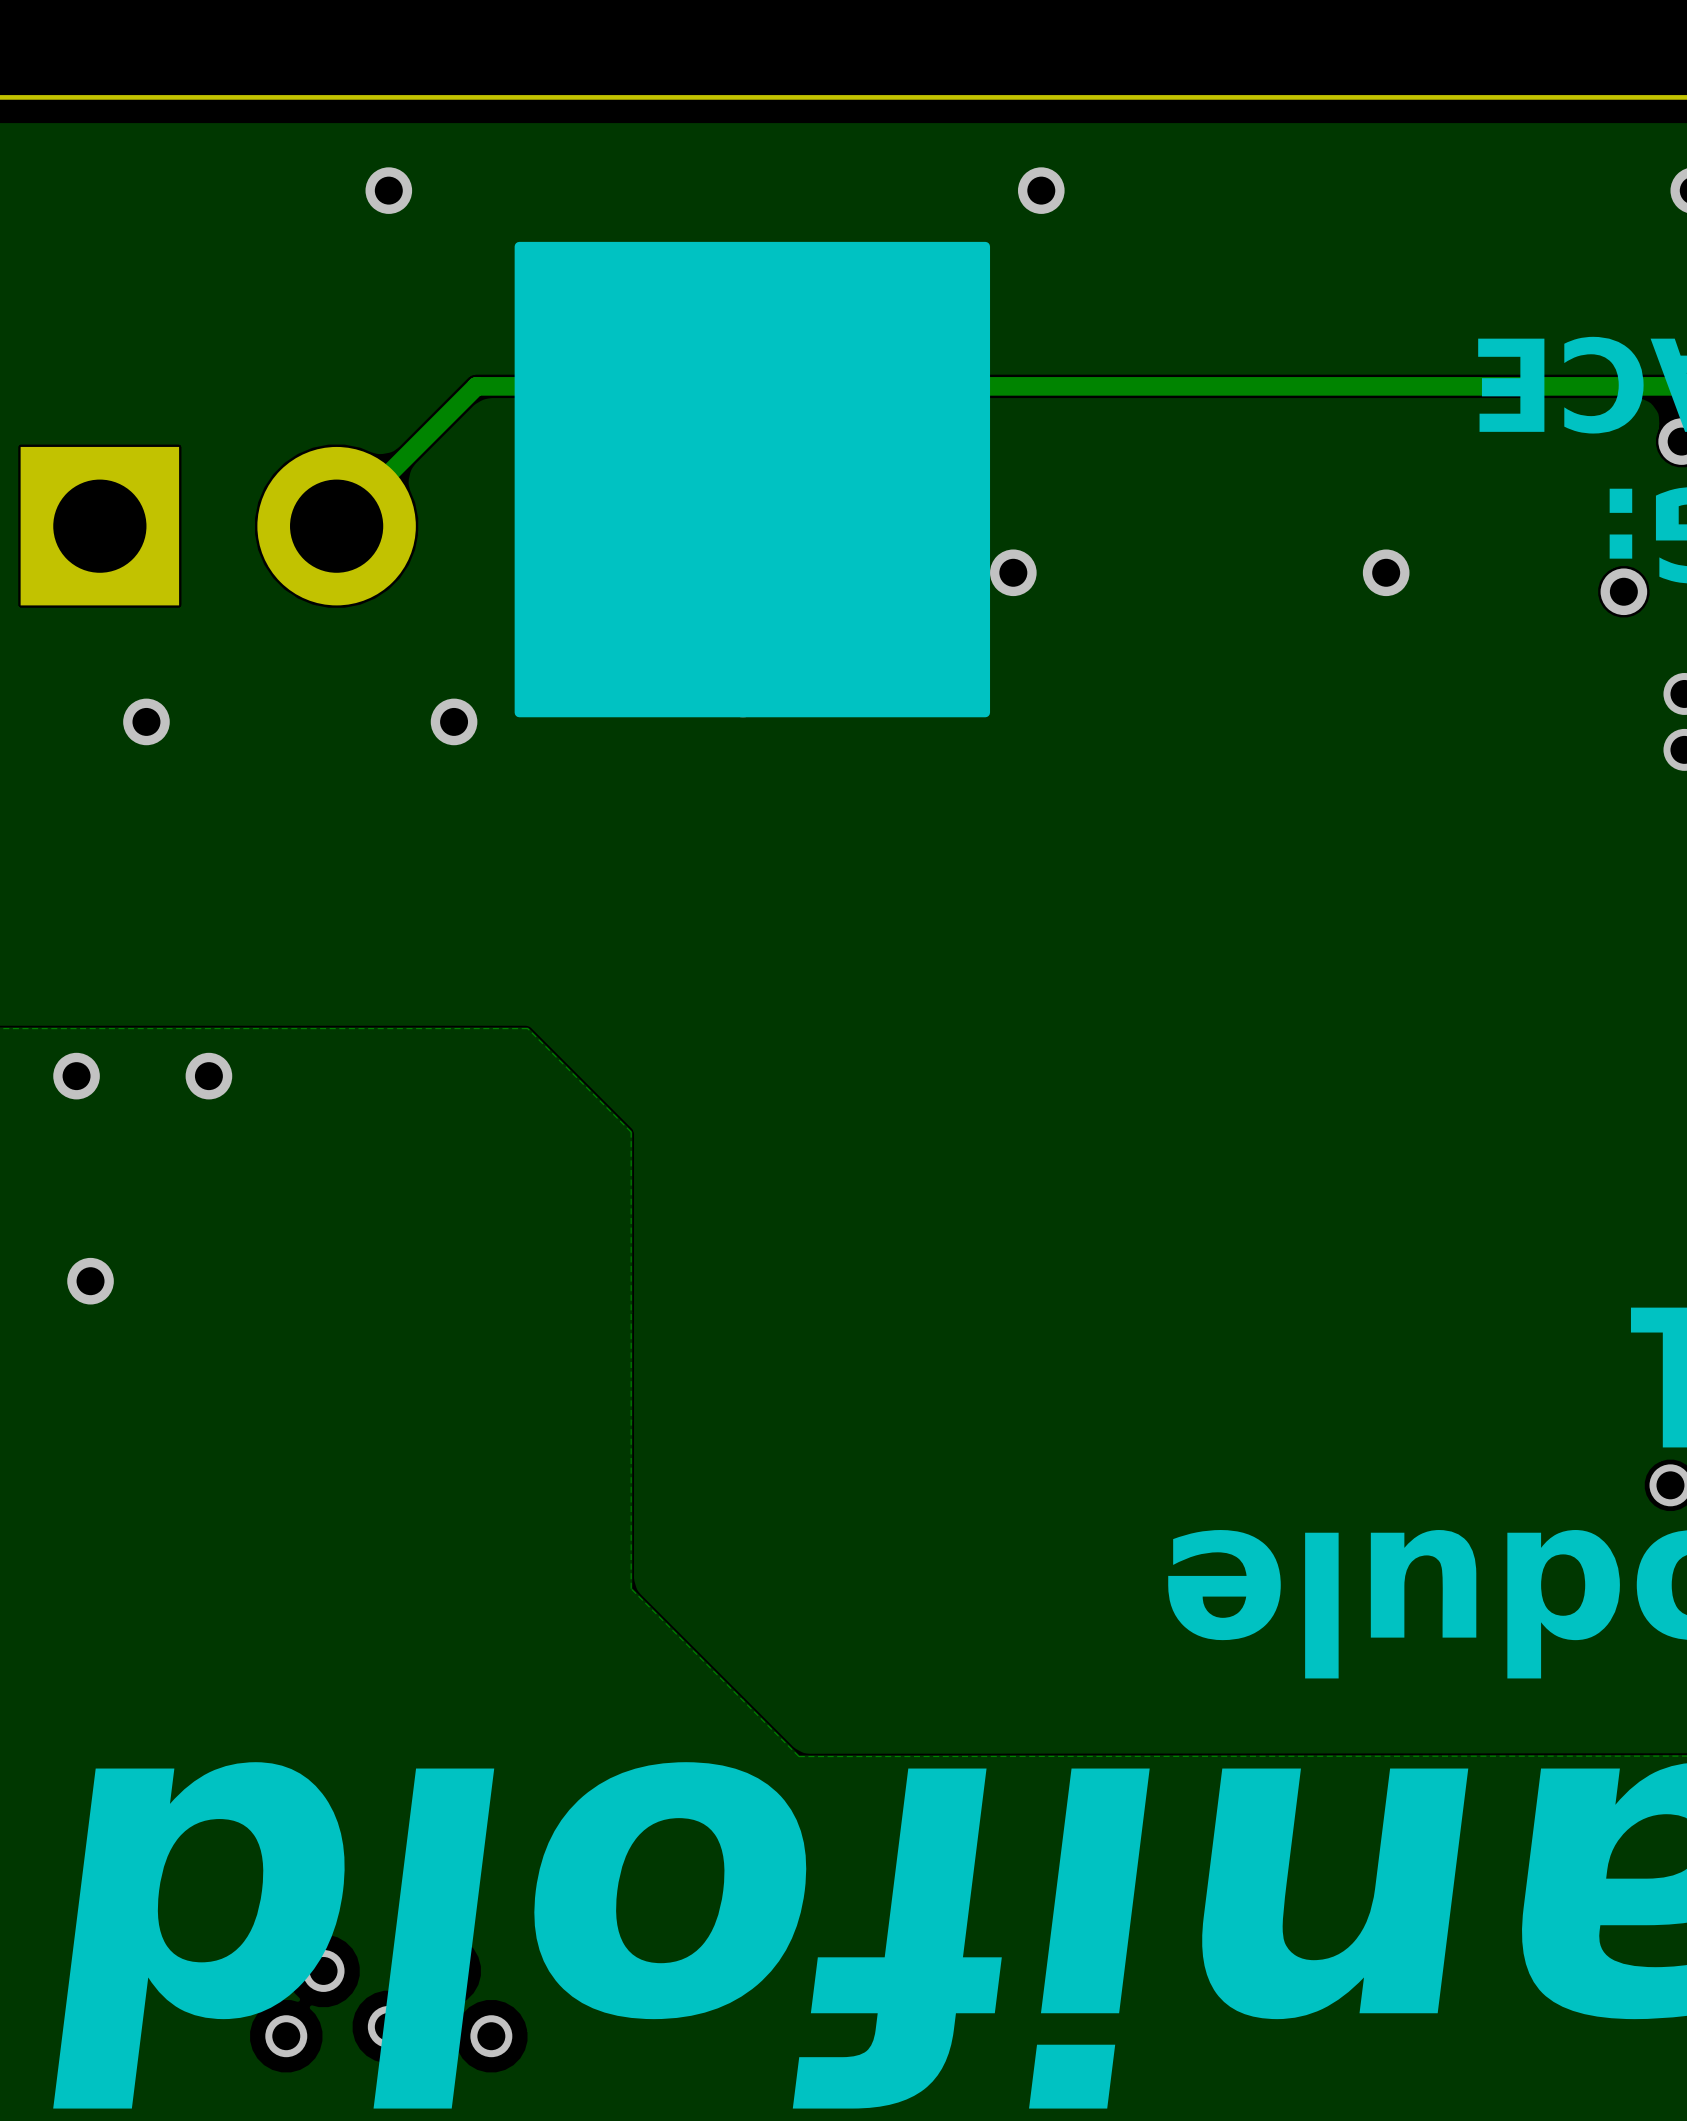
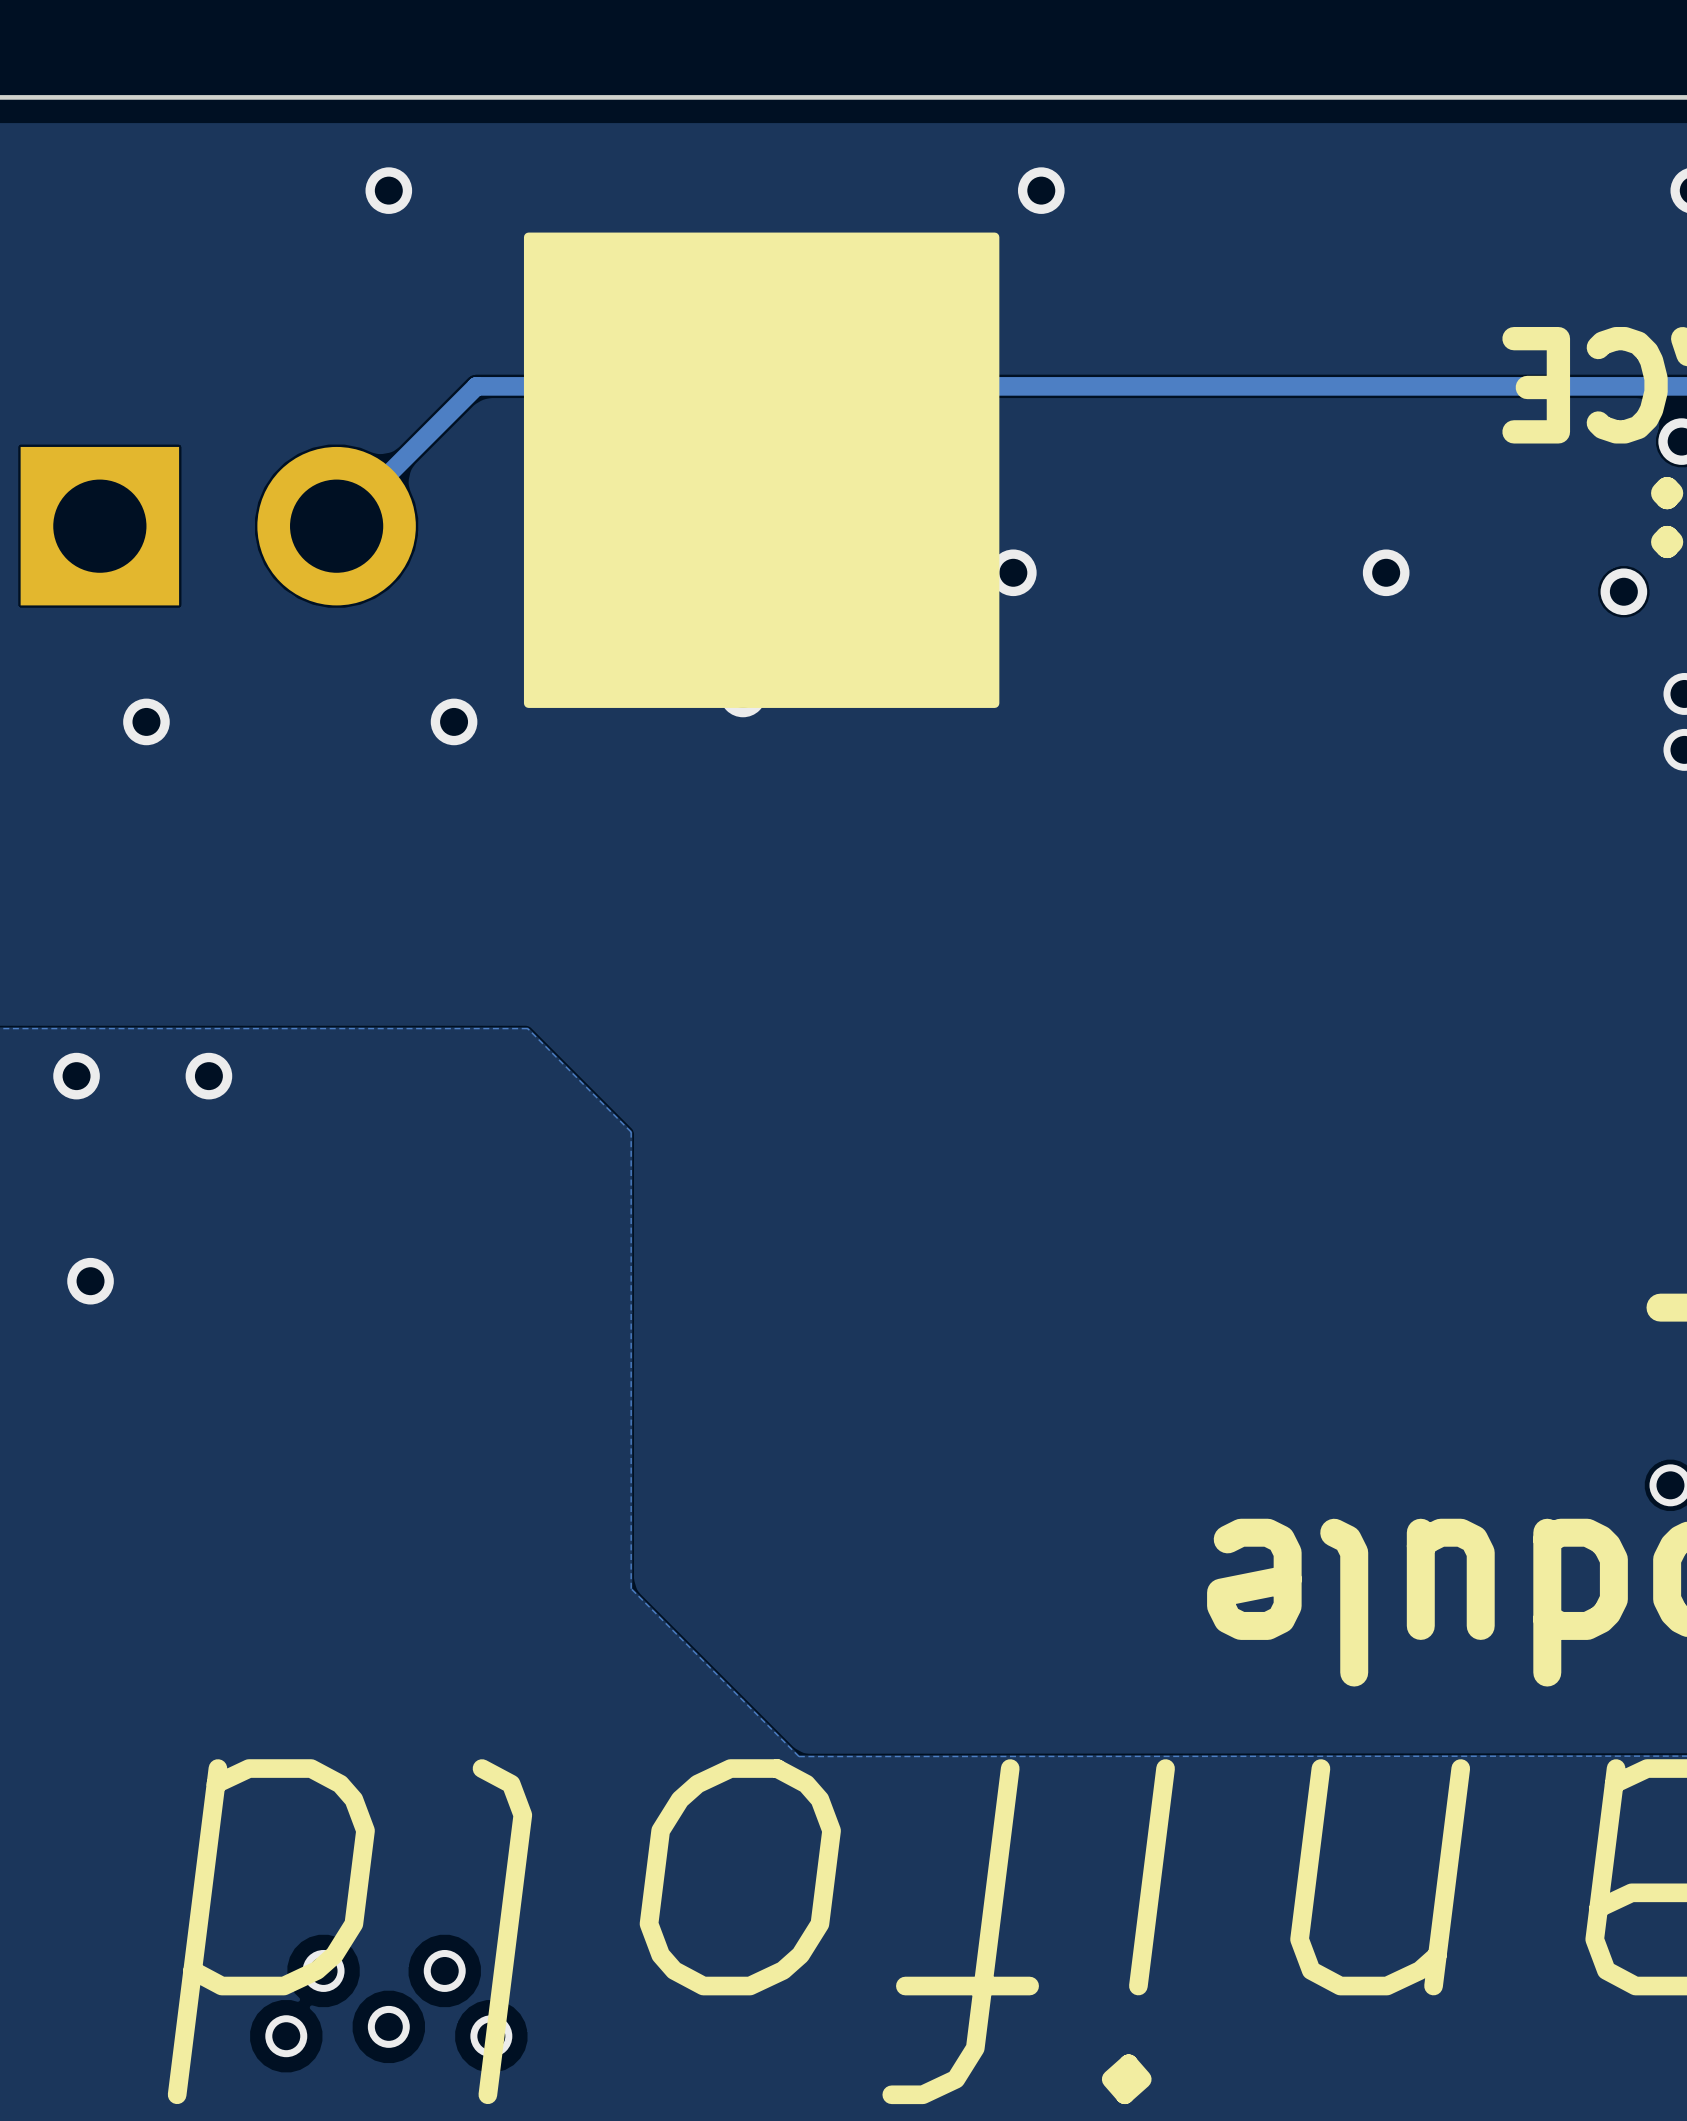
drawing position: (752, 479) -> (761, 470)

